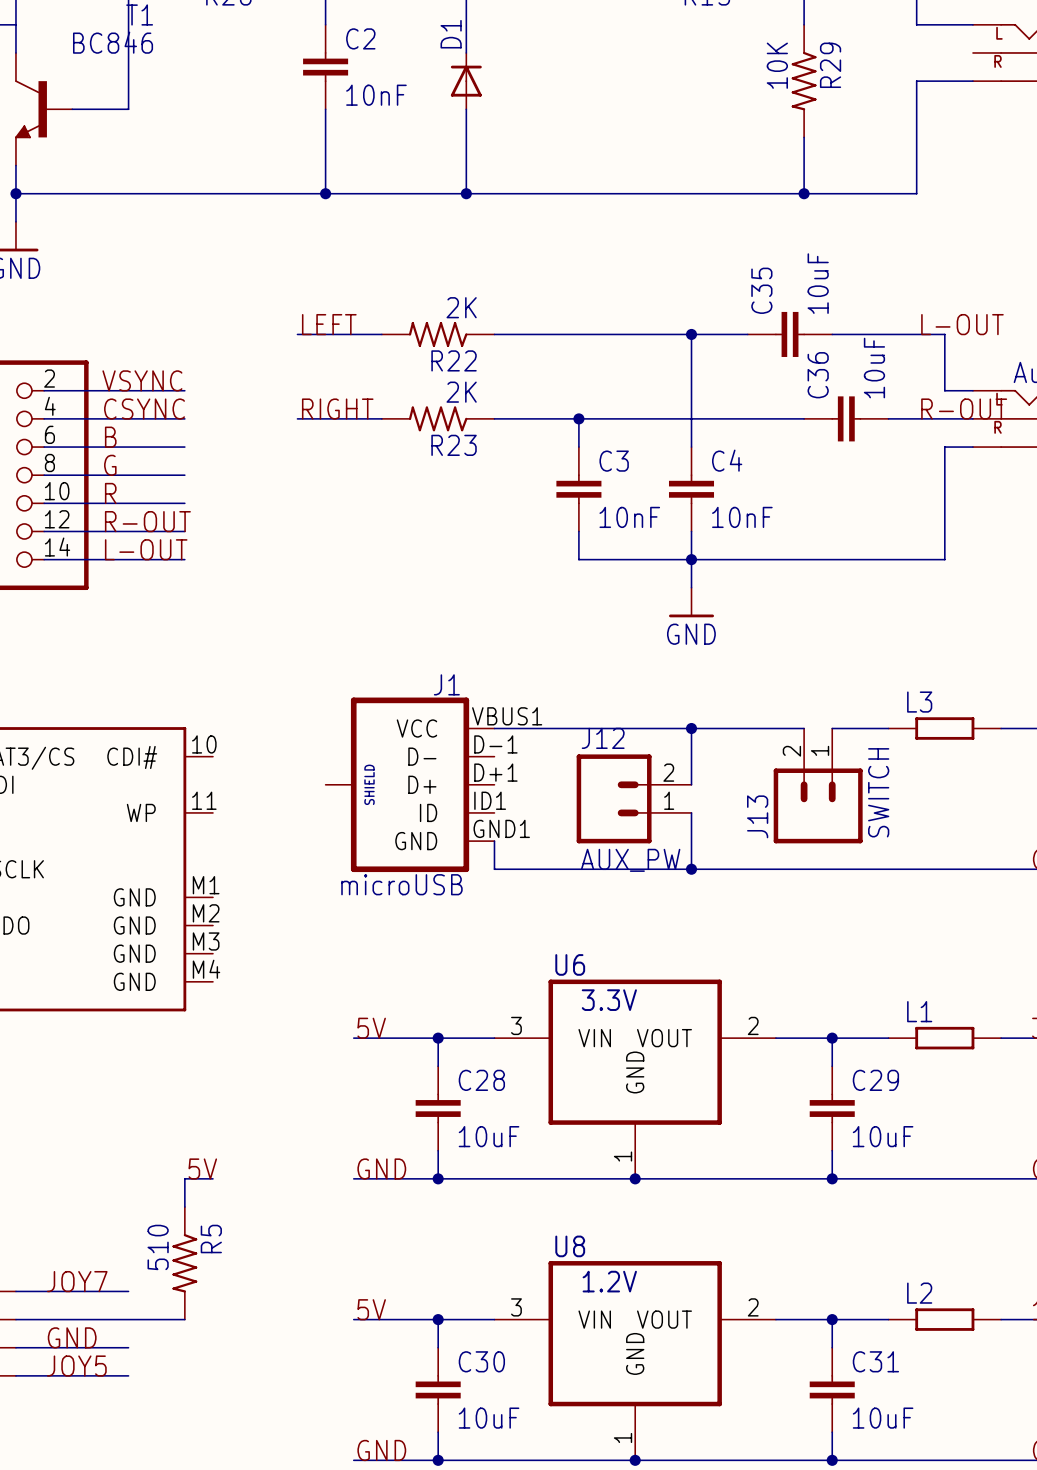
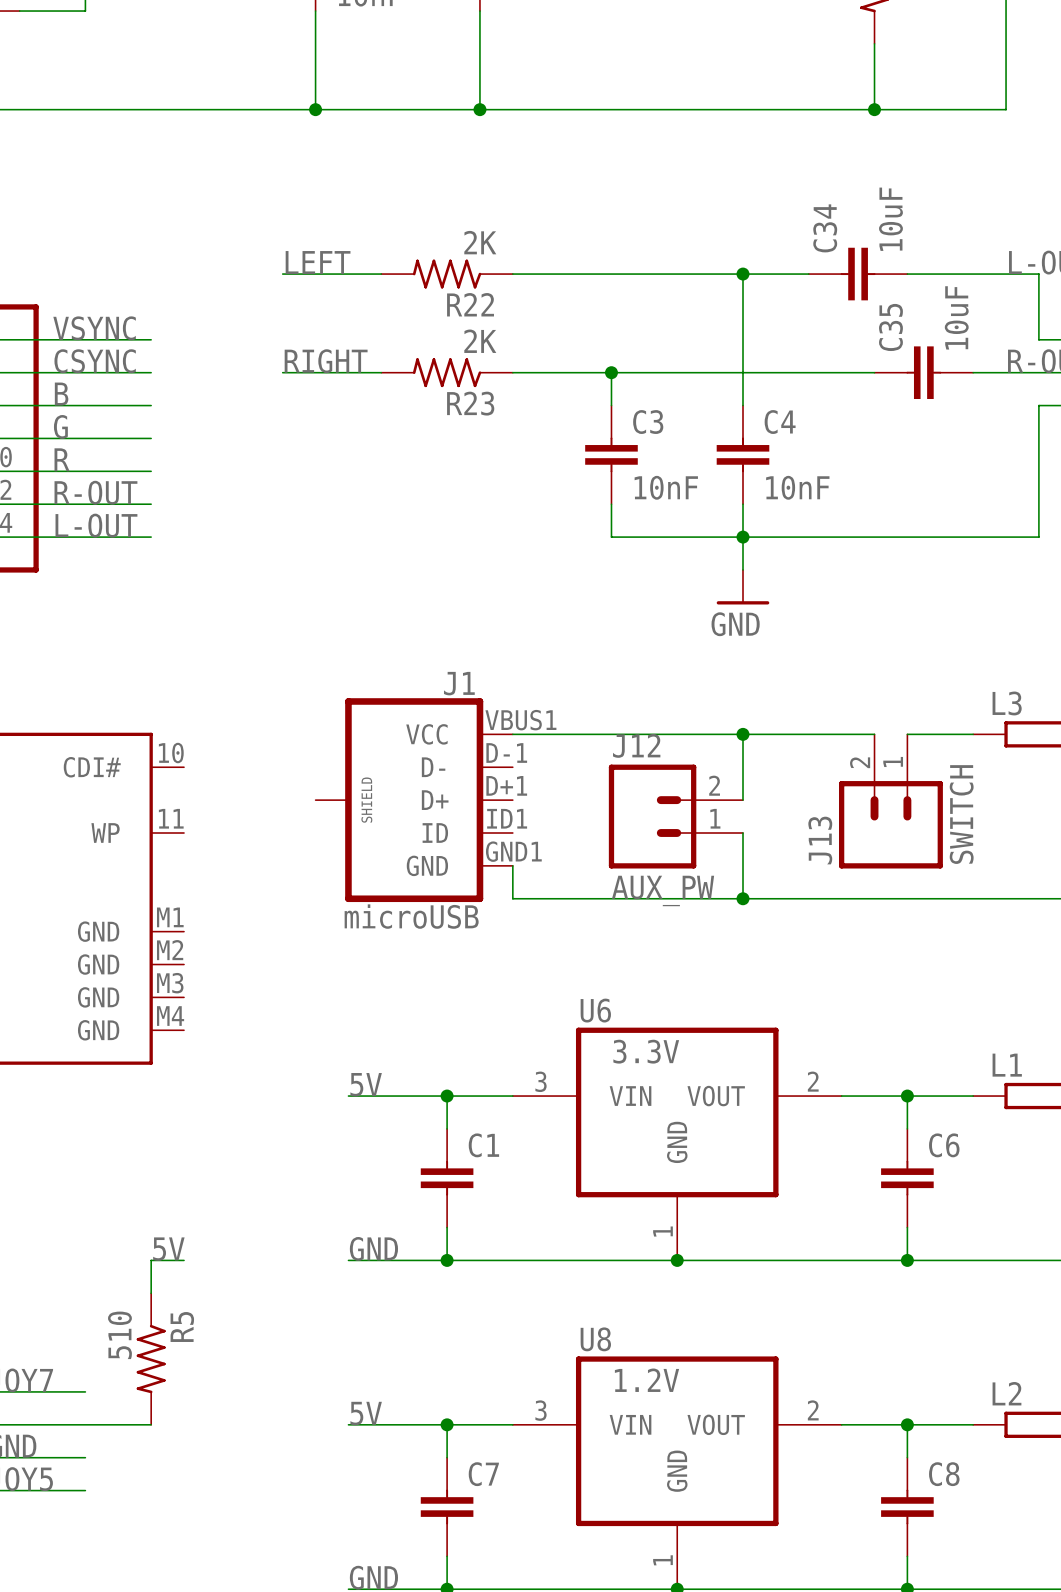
C35 name: C35 (761, 290) -> C34 (825, 228)
C36 name: C36 (818, 375) -> C35 (890, 327)
C28 name: C28 (481, 1080) -> C1 (483, 1145)
C29 name: C29 (875, 1080) -> C6 (944, 1145)
C28 value: 10uF (489, 1136) -> none
C29 value: 10uF (883, 1136) -> none
C30 name: C30 (481, 1361) -> C7 (483, 1474)
C31 name: C31 (875, 1361) -> C8 (944, 1474)
C30 value: 10uF (489, 1418) -> none
C31 value: 10uF (883, 1418) -> none

